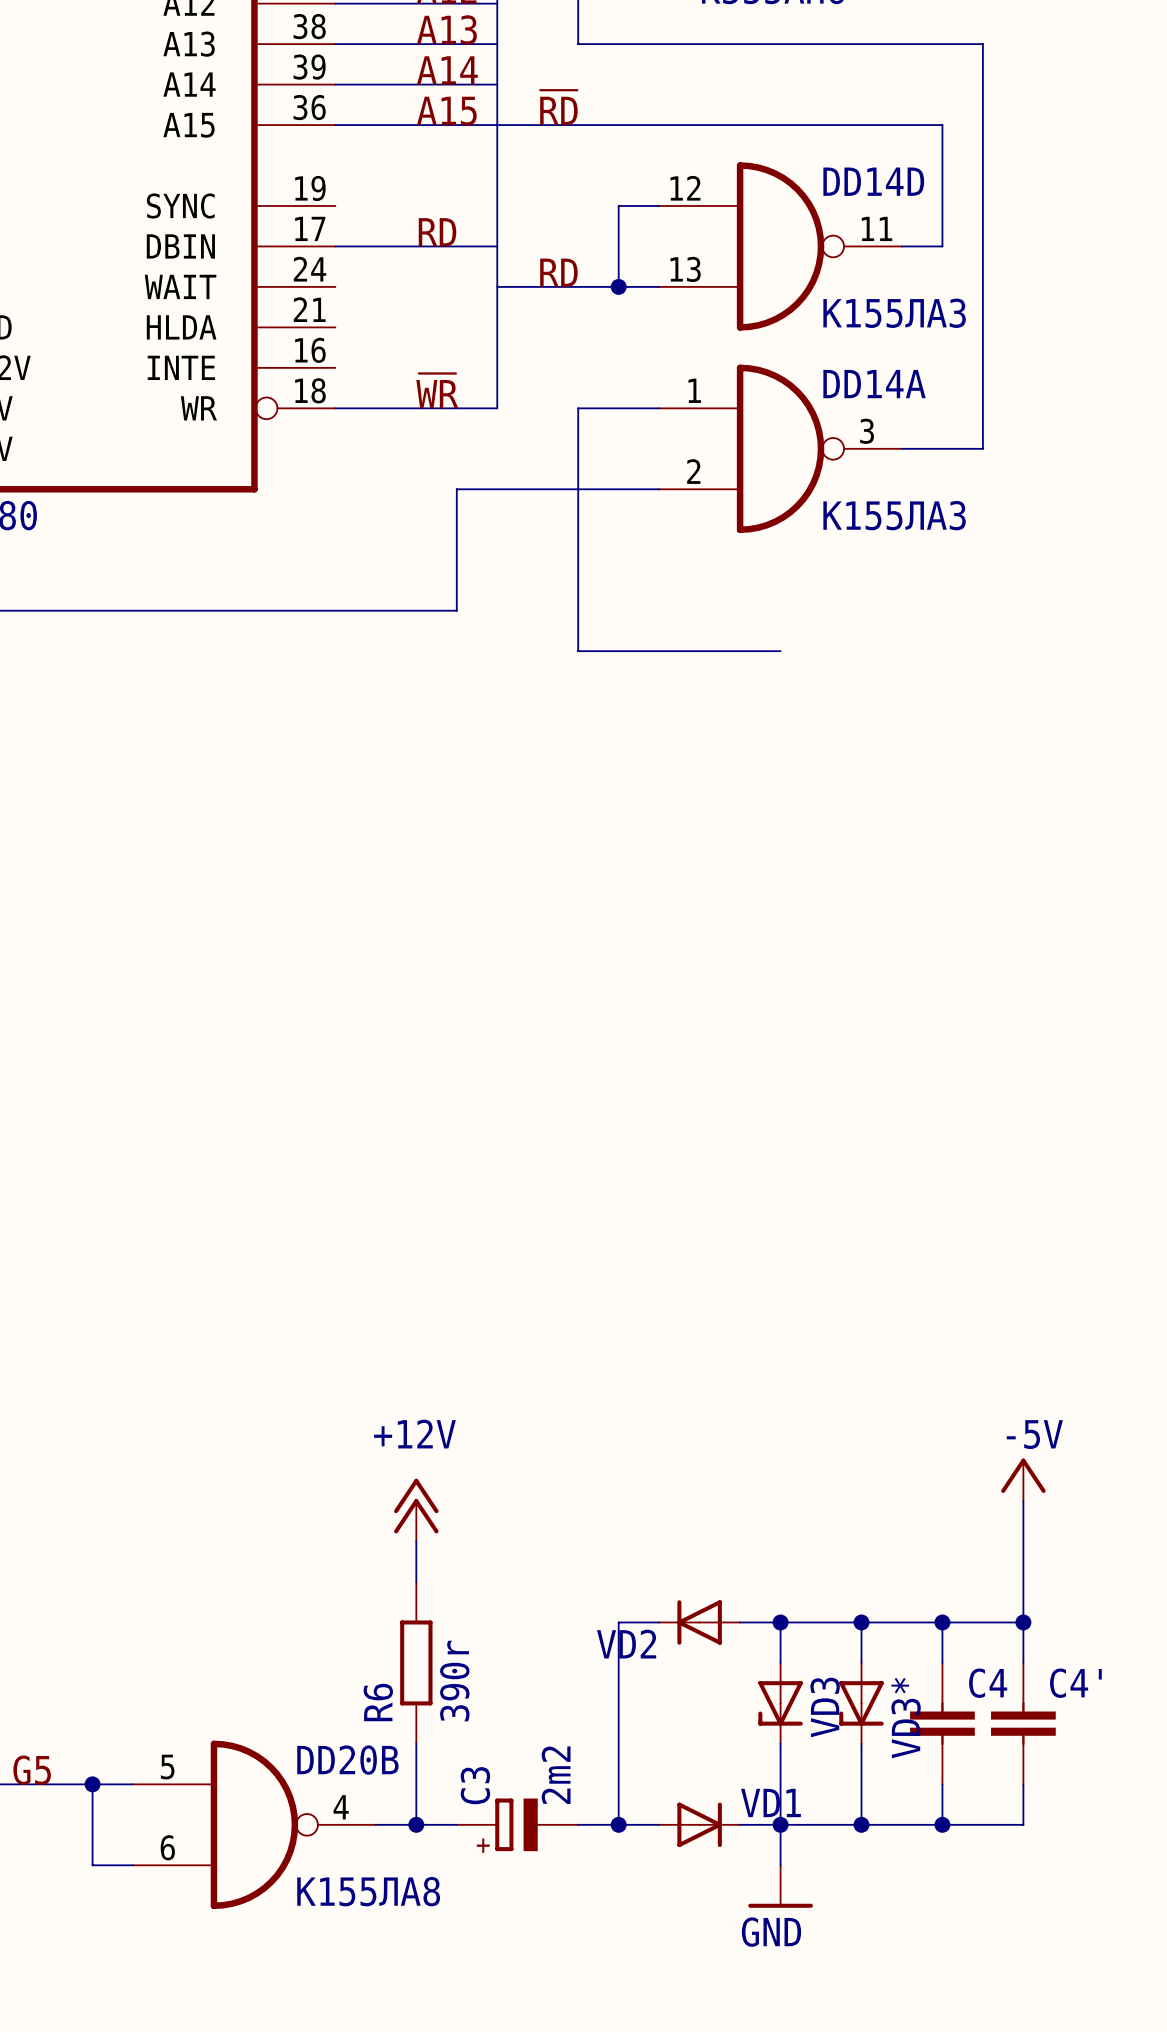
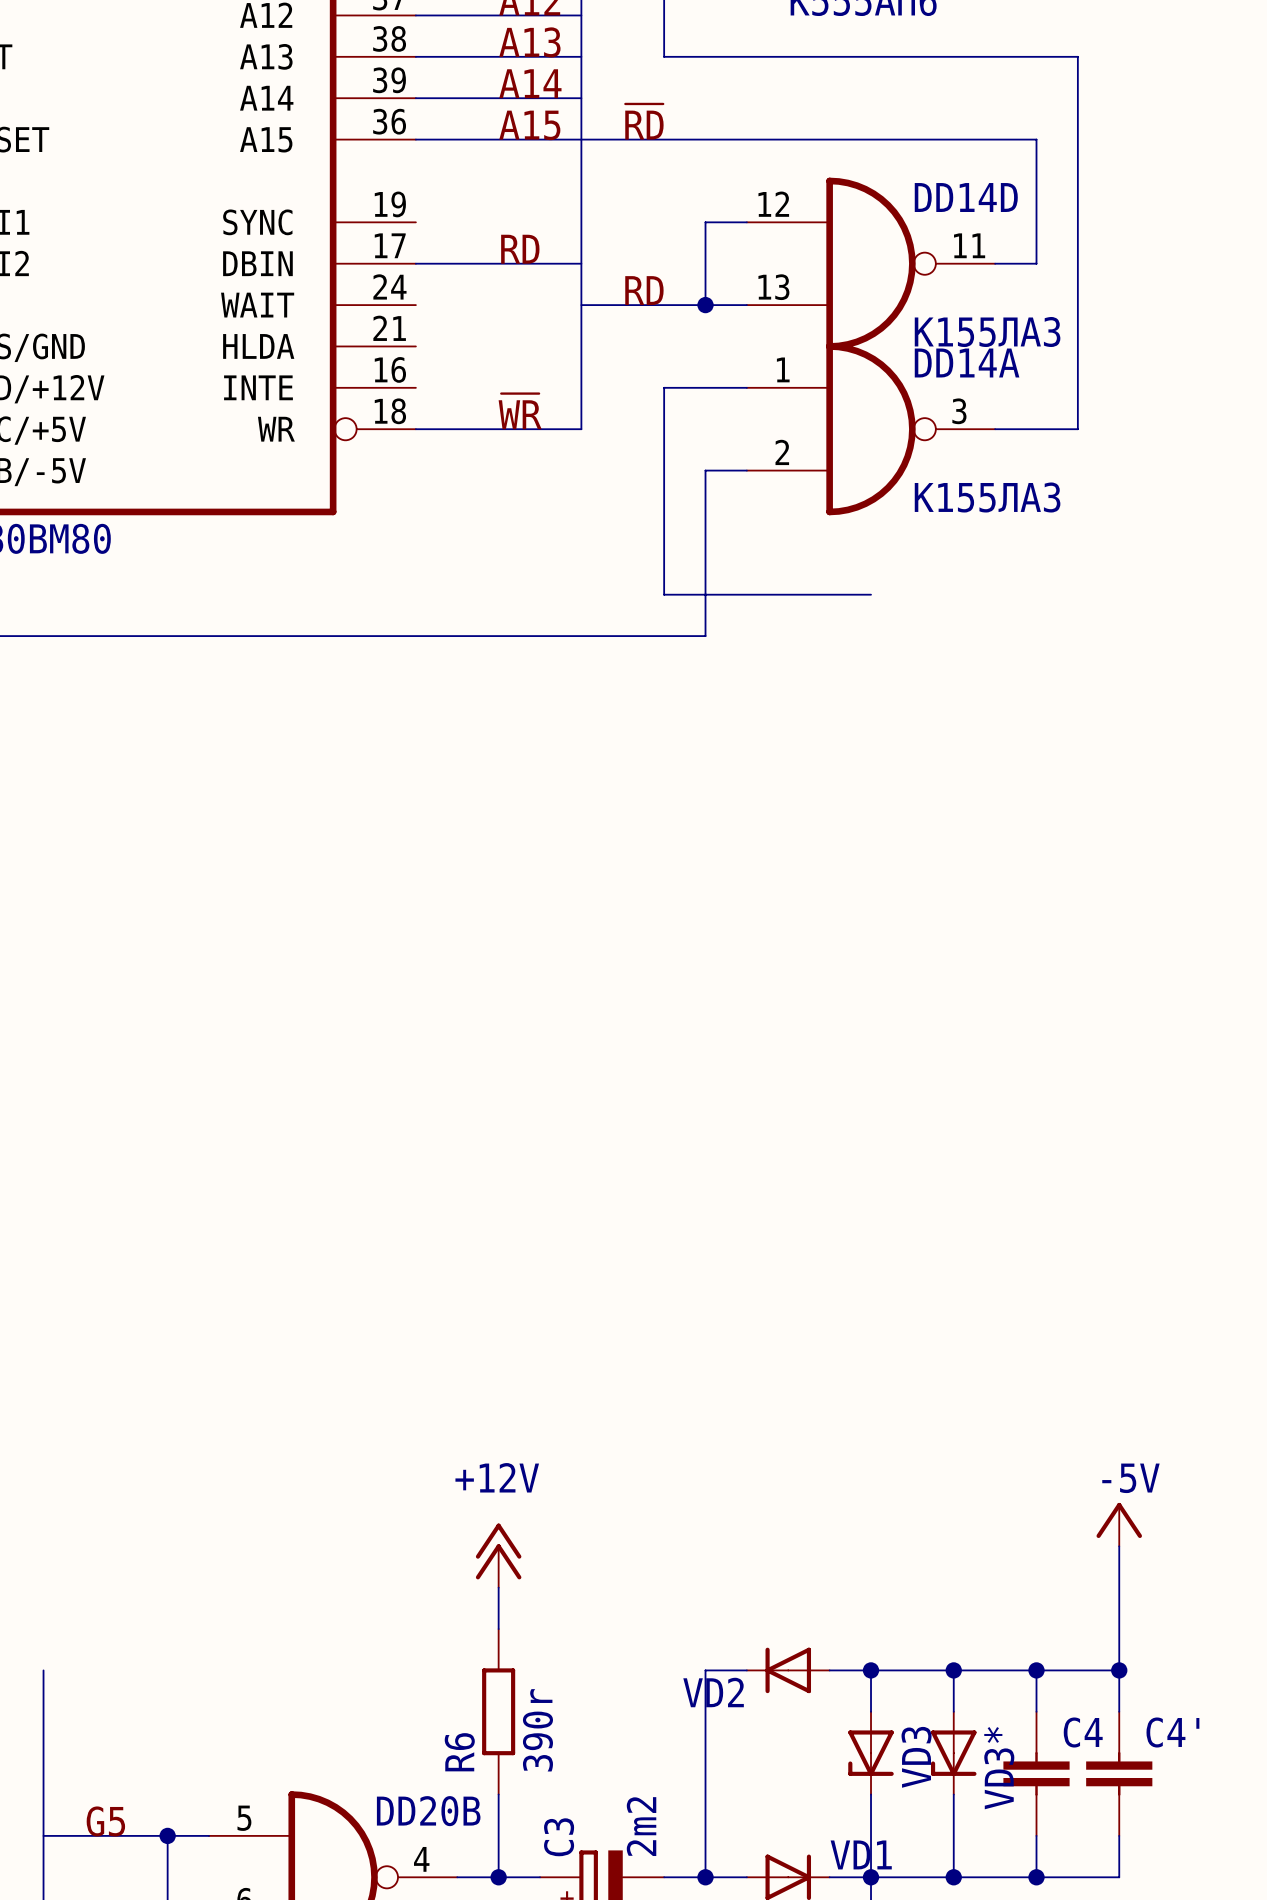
wire: (578, 408) (659, 408) -> (664, 429) (664, 387) (746, 387)
wire: (982, 408) (982, 448) (901, 448) -> (1077, 429) (995, 429)
DD14A position: (780, 448) -> (871, 429)
wire: (659, 489) (456, 489) (456, 610) -> (746, 470) (705, 470) (705, 636) (540, 636)
wire: (578, 570) (578, 651) (780, 651) -> (664, 594) (871, 594)

